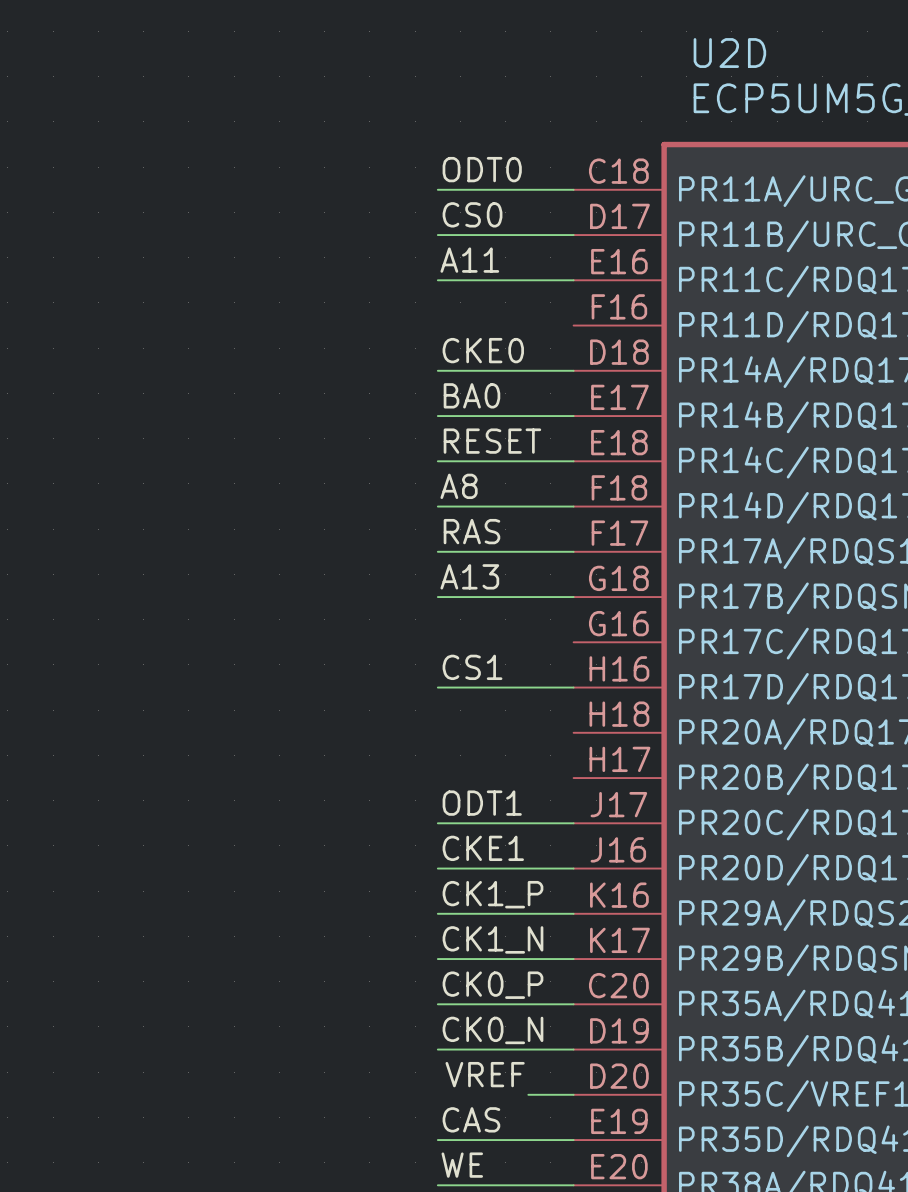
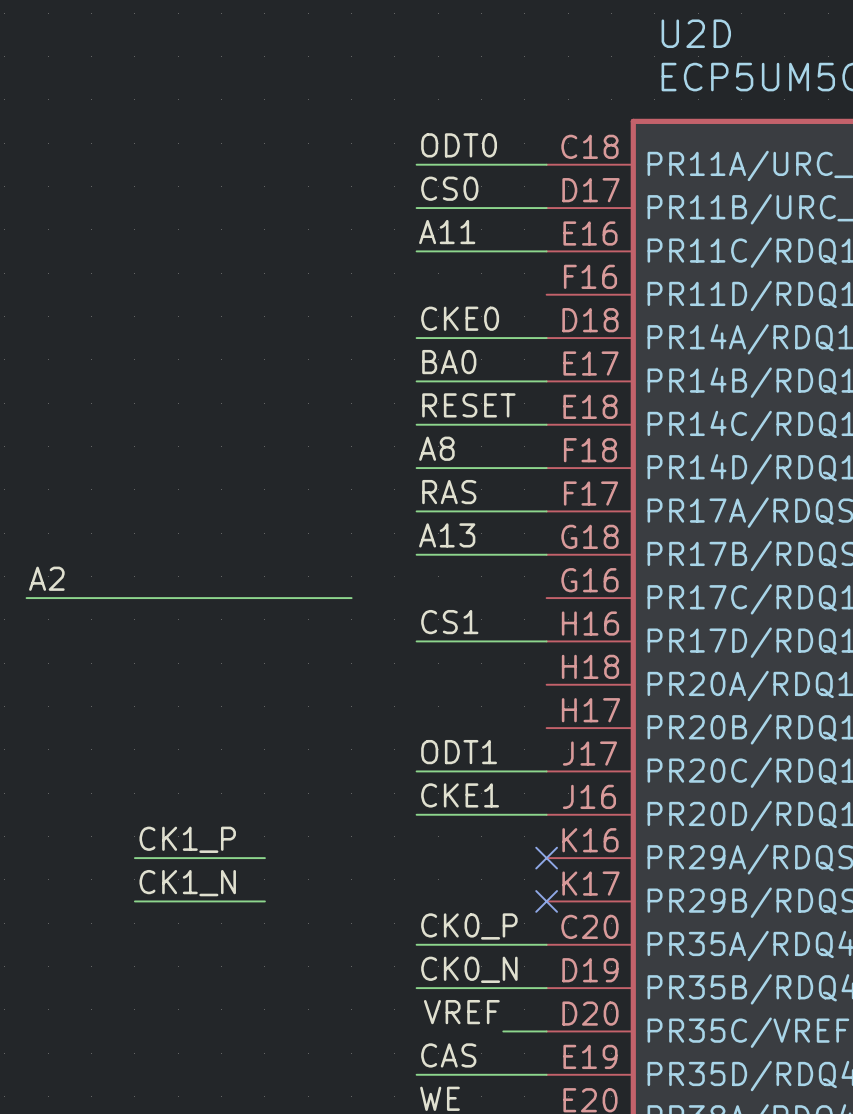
label: none -> A2 (46, 578)
wire: none -> (26, 598) (351, 598)
label position: CK1_P (492, 894) -> CK1_P (187, 839)
wire: (437, 913) (573, 913) -> (134, 858) (264, 858)
no-connect mark: none -> (546, 858)
label position: CK1_N (492, 939) -> CK1_N (187, 883)
wire: (437, 959) (573, 959) -> (134, 901) (264, 901)
no-connect mark: none -> (546, 901)

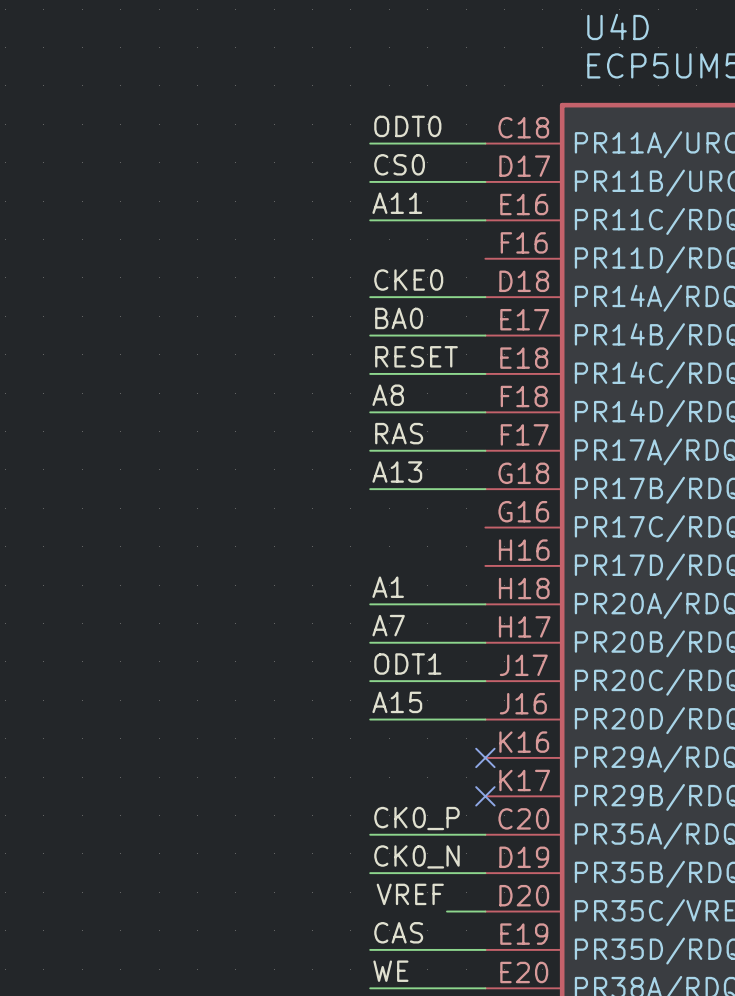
U2D name: U2D (696, 33) -> U4D (618, 26)
label: A2 (46, 578) -> none
wire: (26, 598) (351, 598) -> none
label: CS1 (449, 622) -> none
wire: (416, 641) (546, 641) -> none
label: none -> A1 (388, 587)
label: none -> A7 (388, 625)
label: CKE1 (460, 795) -> A15 (397, 702)
label: CK1_P (187, 839) -> none
wire: (134, 858) (264, 858) -> (370, 604) (485, 604)
label: CK1_N (187, 883) -> none
wire: (134, 901) (264, 901) -> (370, 642) (485, 642)

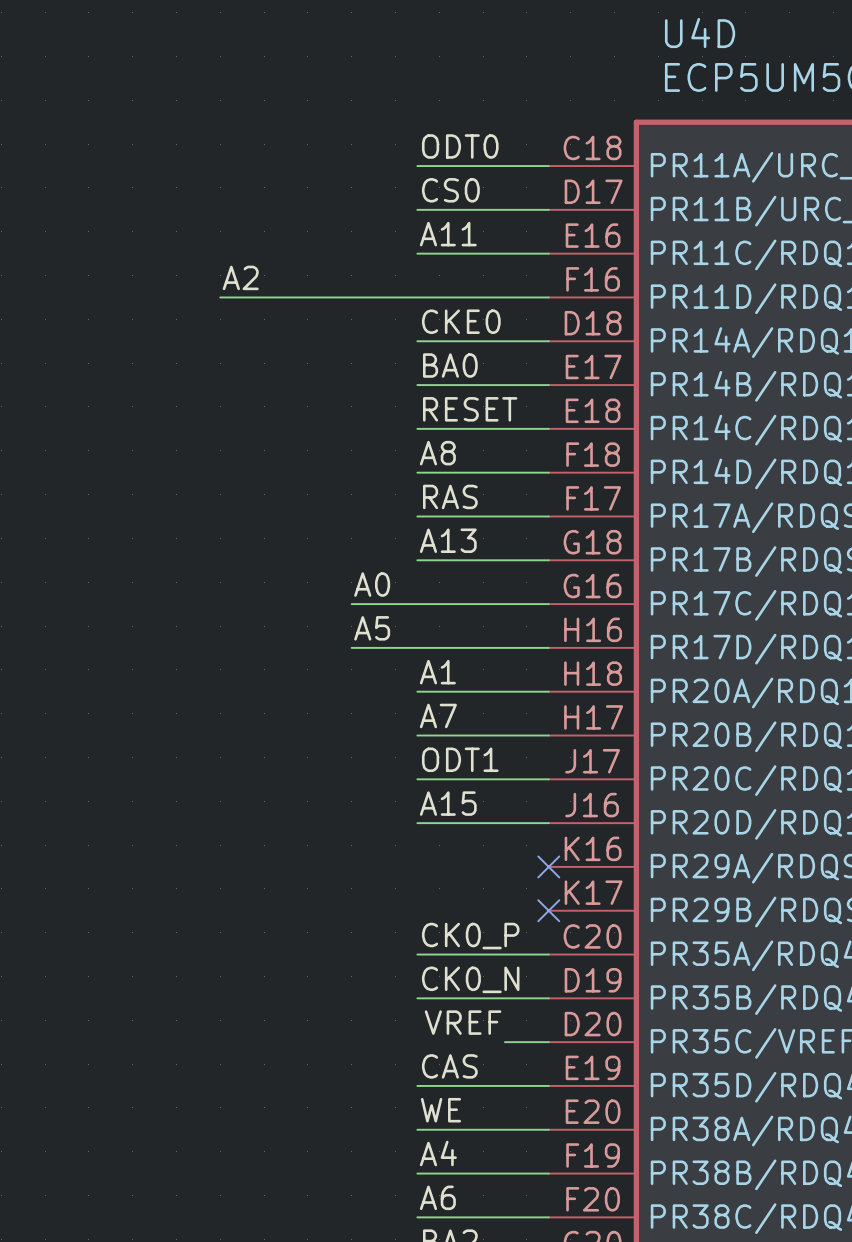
label: none -> A2 (240, 277)
wire: none -> (220, 297) (548, 297)
label: none -> A0 (372, 584)
wire: none -> (351, 604) (548, 604)
label: none -> A5 (372, 628)
wire: none -> (351, 647) (548, 647)

